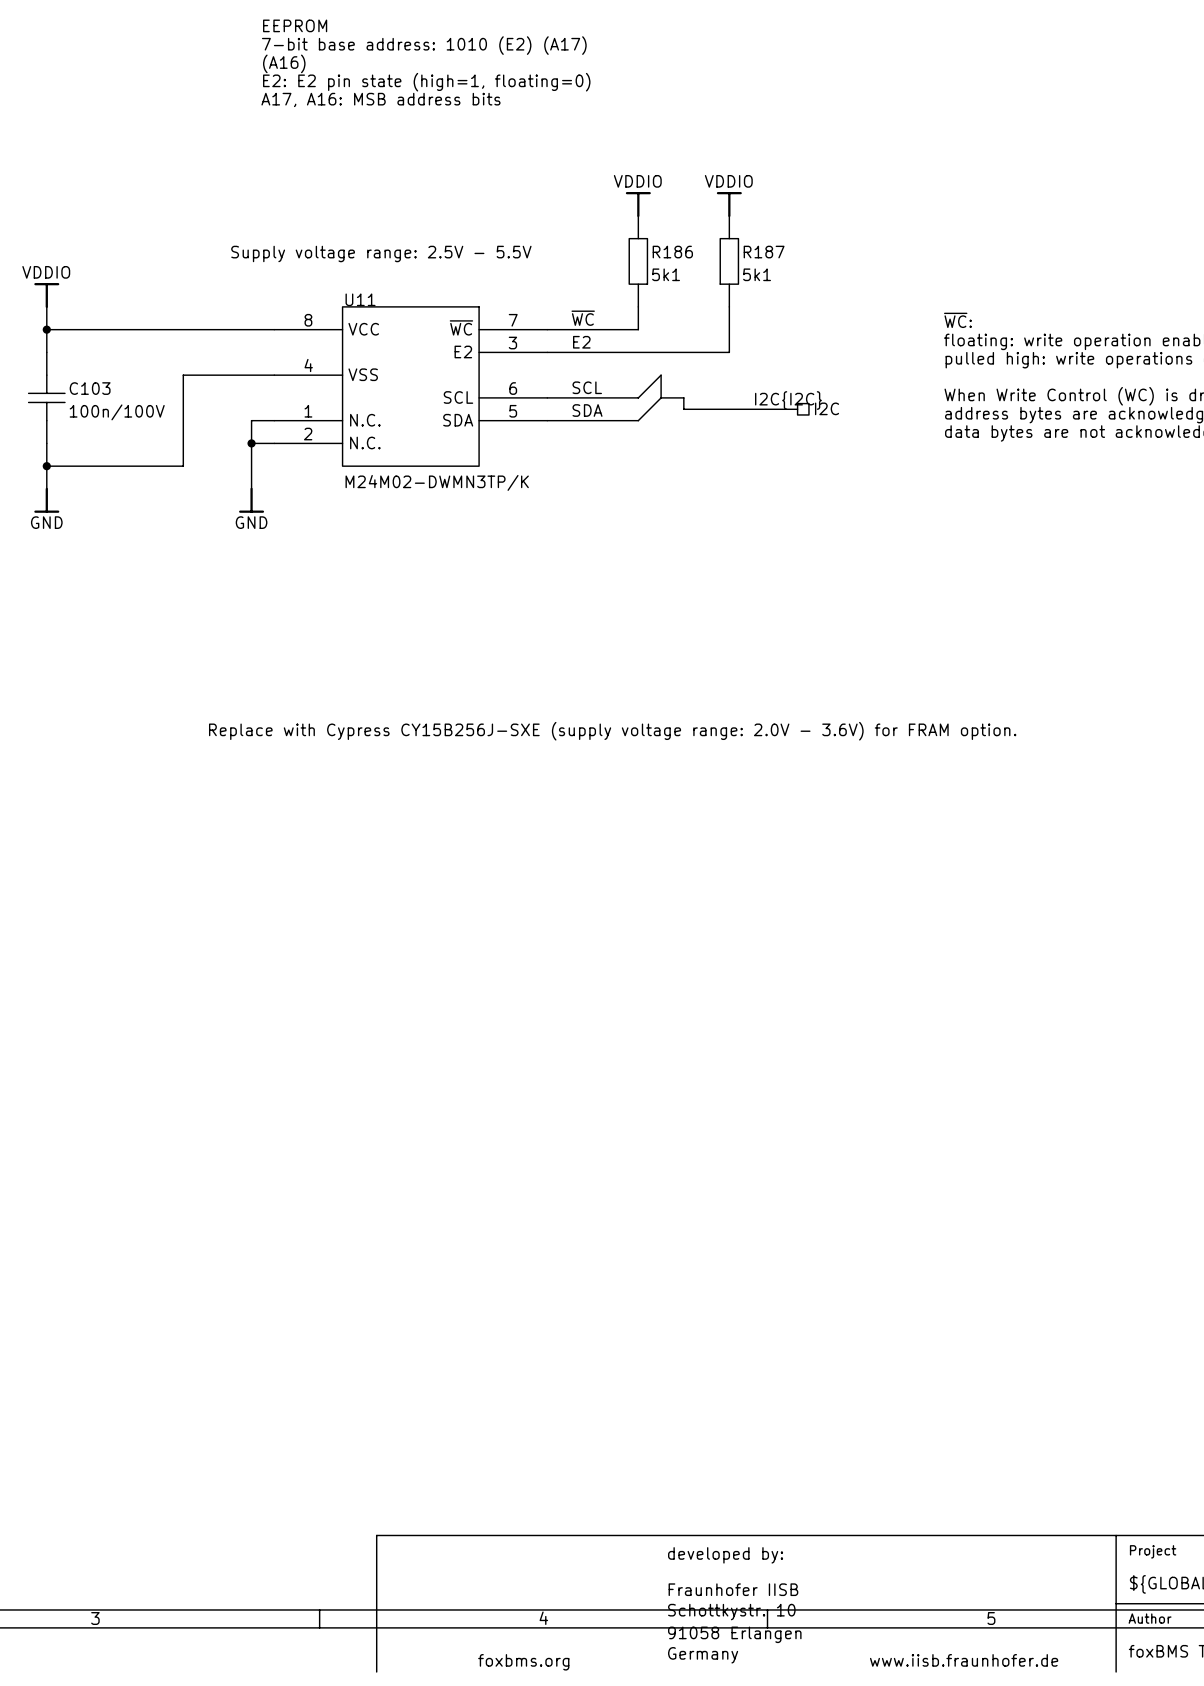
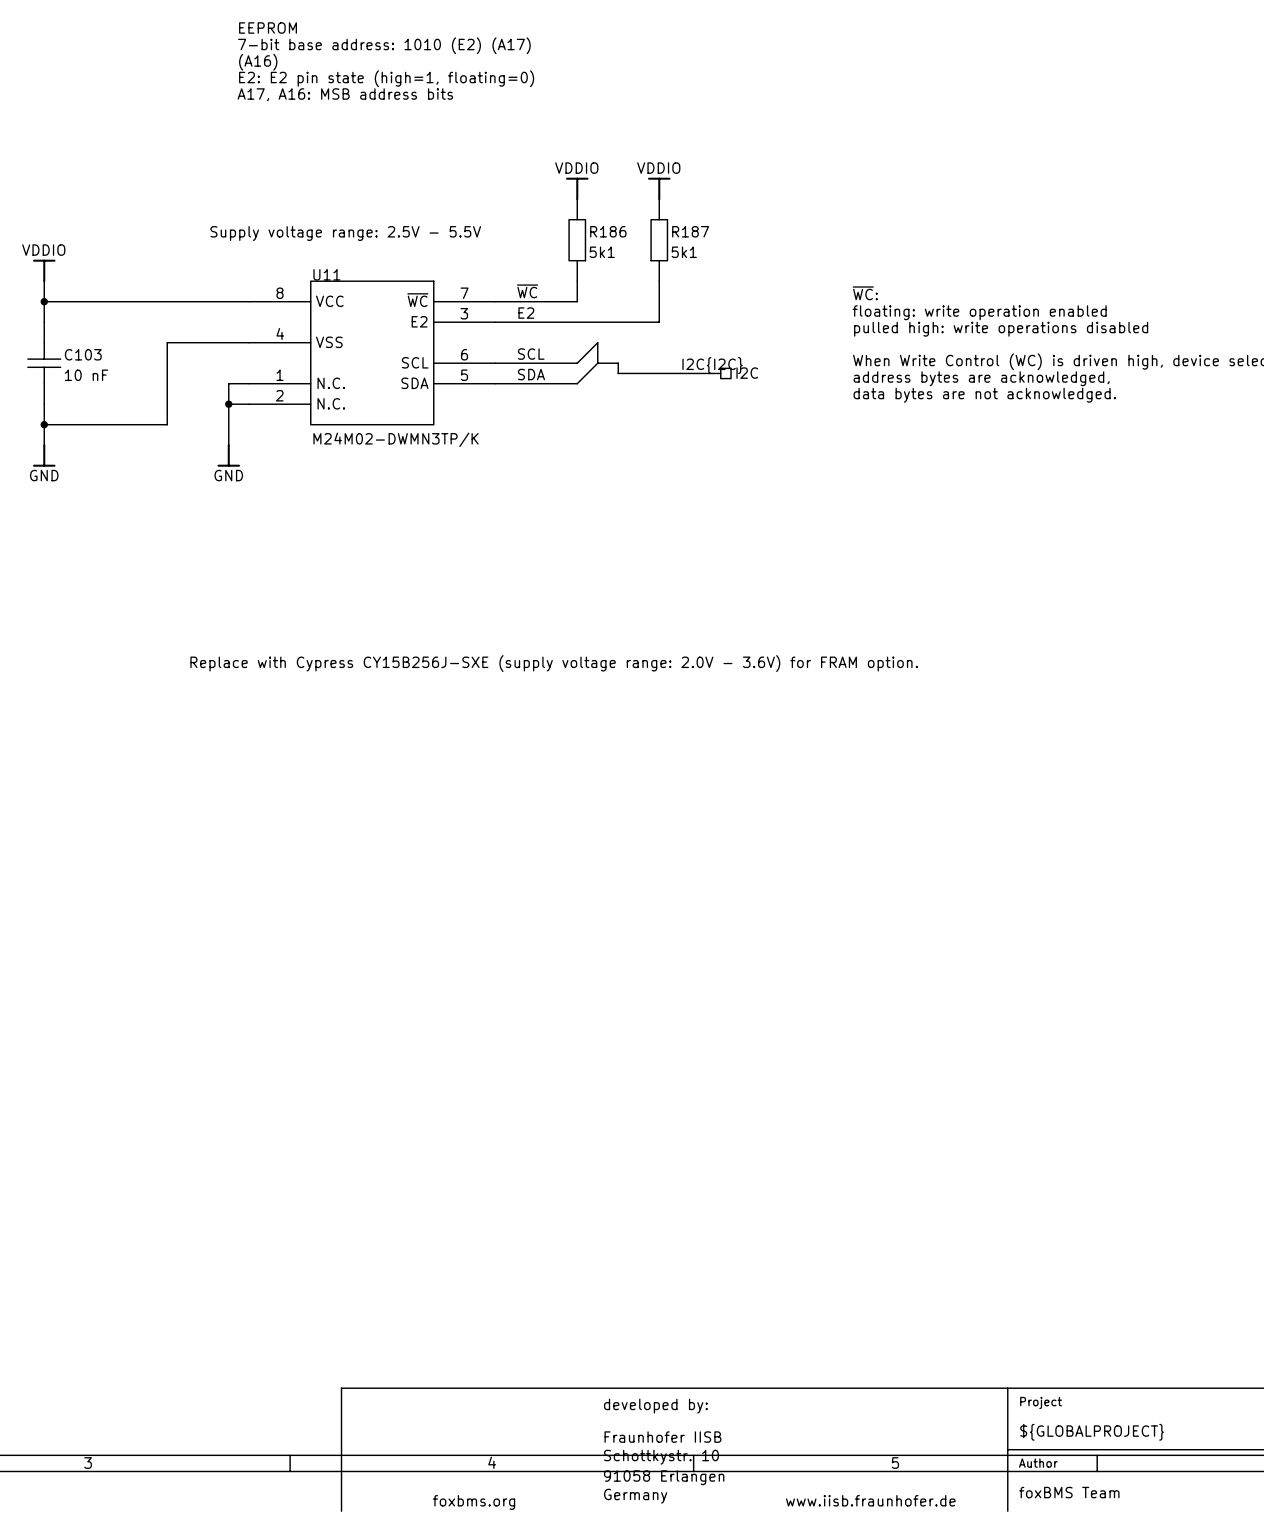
C103 value: 100n/100V (117, 412) -> 10 nF (86, 375)

